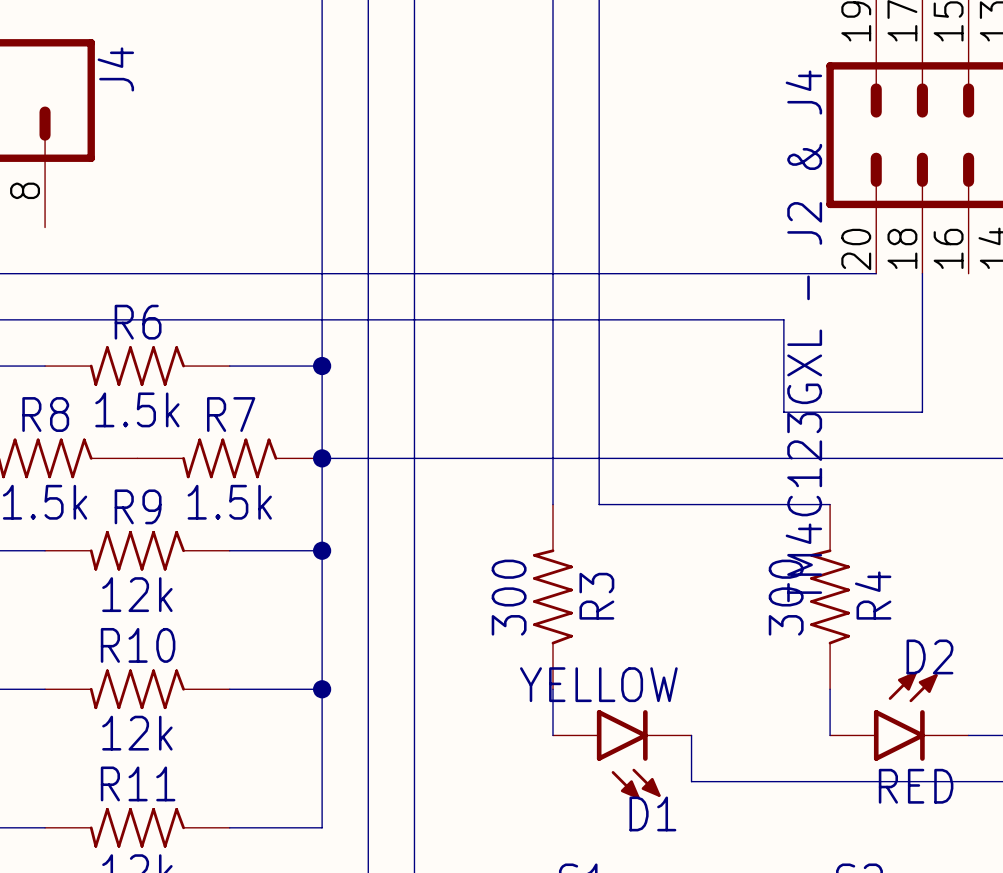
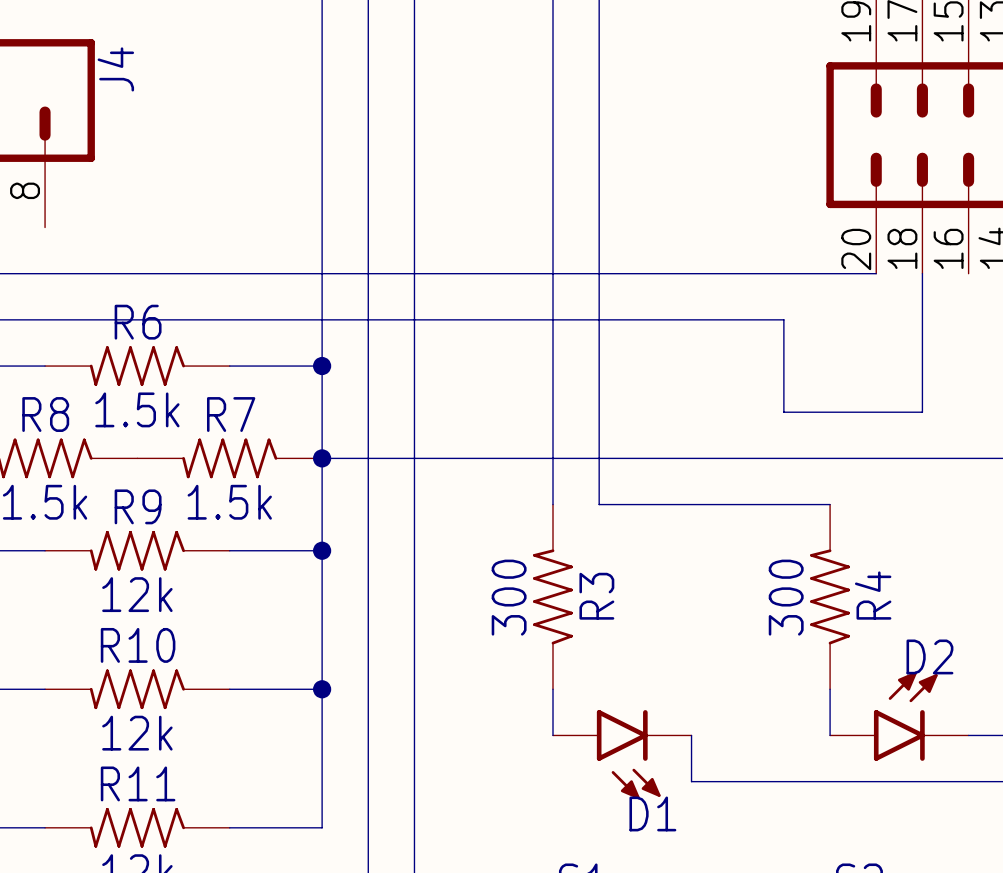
part value: TM4C123GXL - J2 & J4 (803, 336) -> none
D1 value: YELLOW (598, 684) -> none
D2 value: RED (916, 786) -> none

